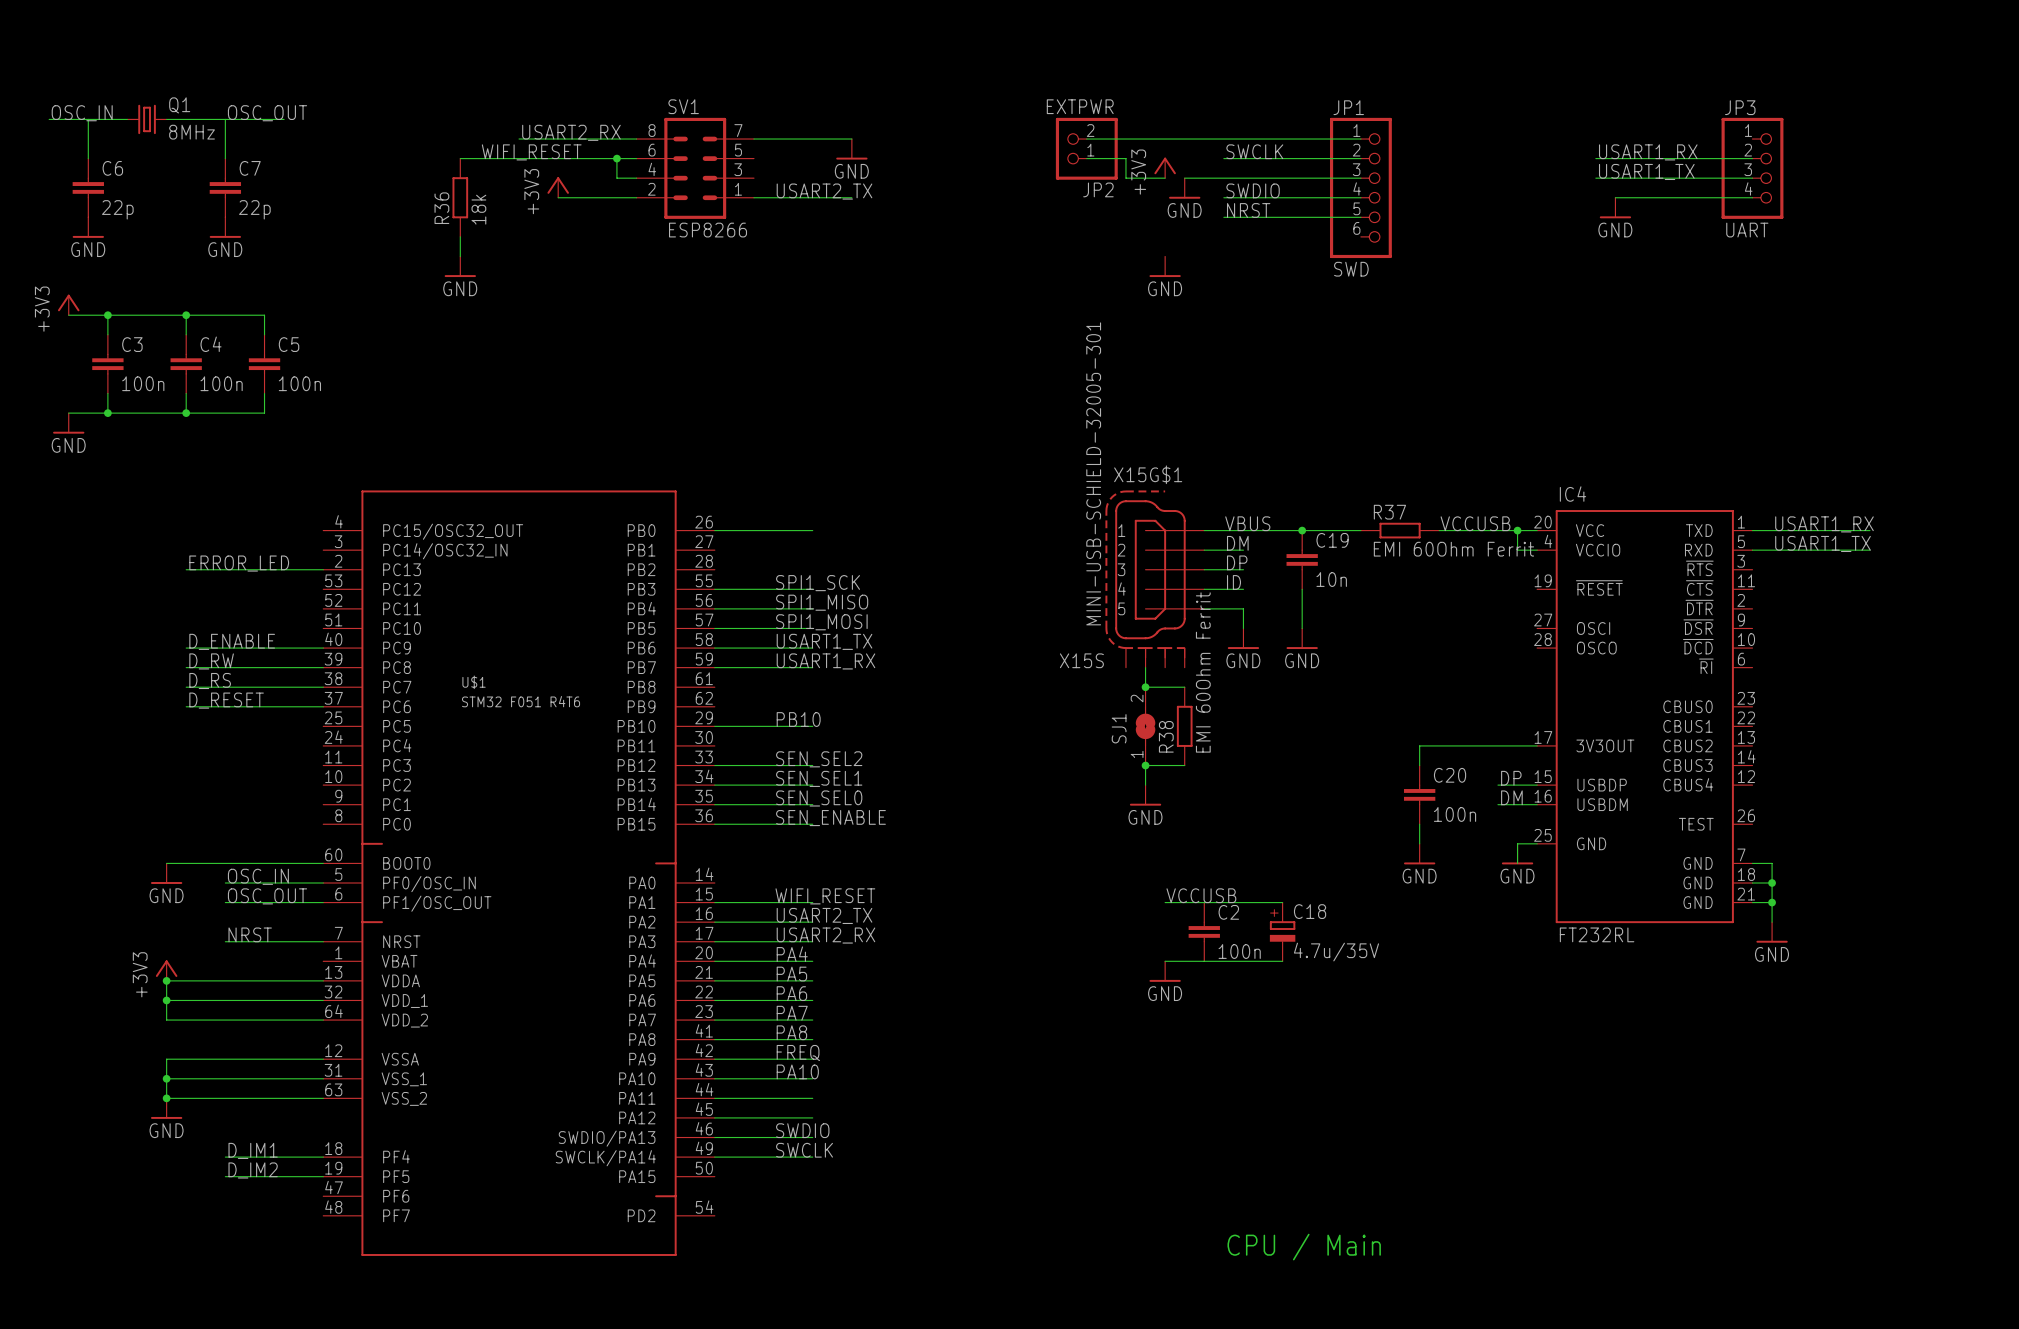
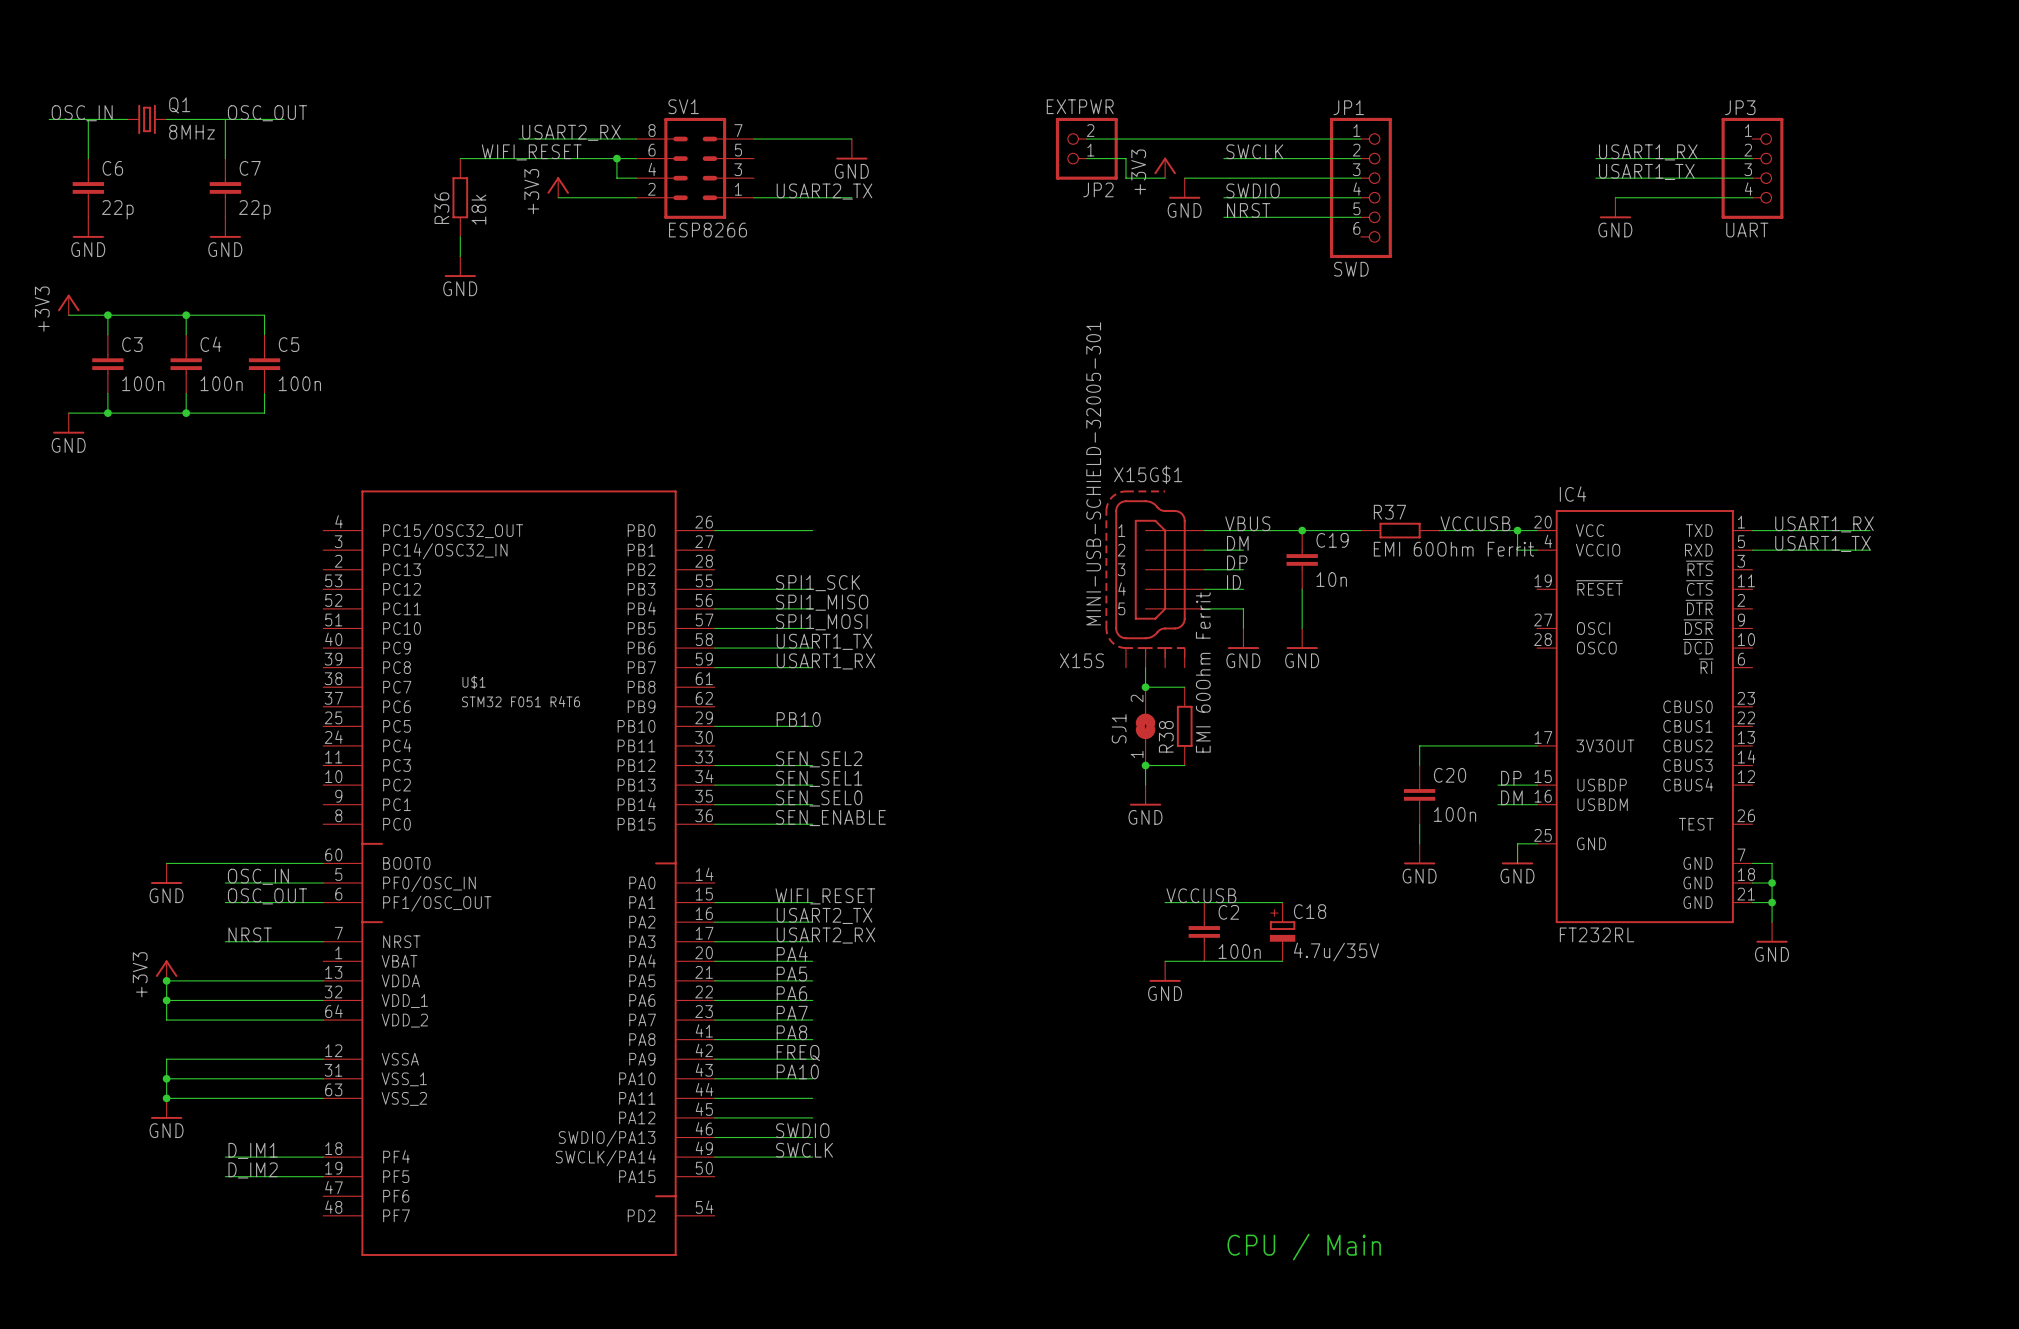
power symbol: GND (1165, 266) -> none
label: ERROR_LED (239, 563) -> none
wire: (186, 569) (323, 569) -> none
label: D_ENABLE (232, 641) -> none
wire: (186, 648) (323, 648) -> none
label: D_RW (211, 661) -> none
wire: (186, 667) (323, 667) -> none
label: D_RS (210, 681) -> none
wire: (186, 687) (323, 687) -> none
label: D_RESET (226, 700) -> none
wire: (186, 706) (323, 706) -> none

